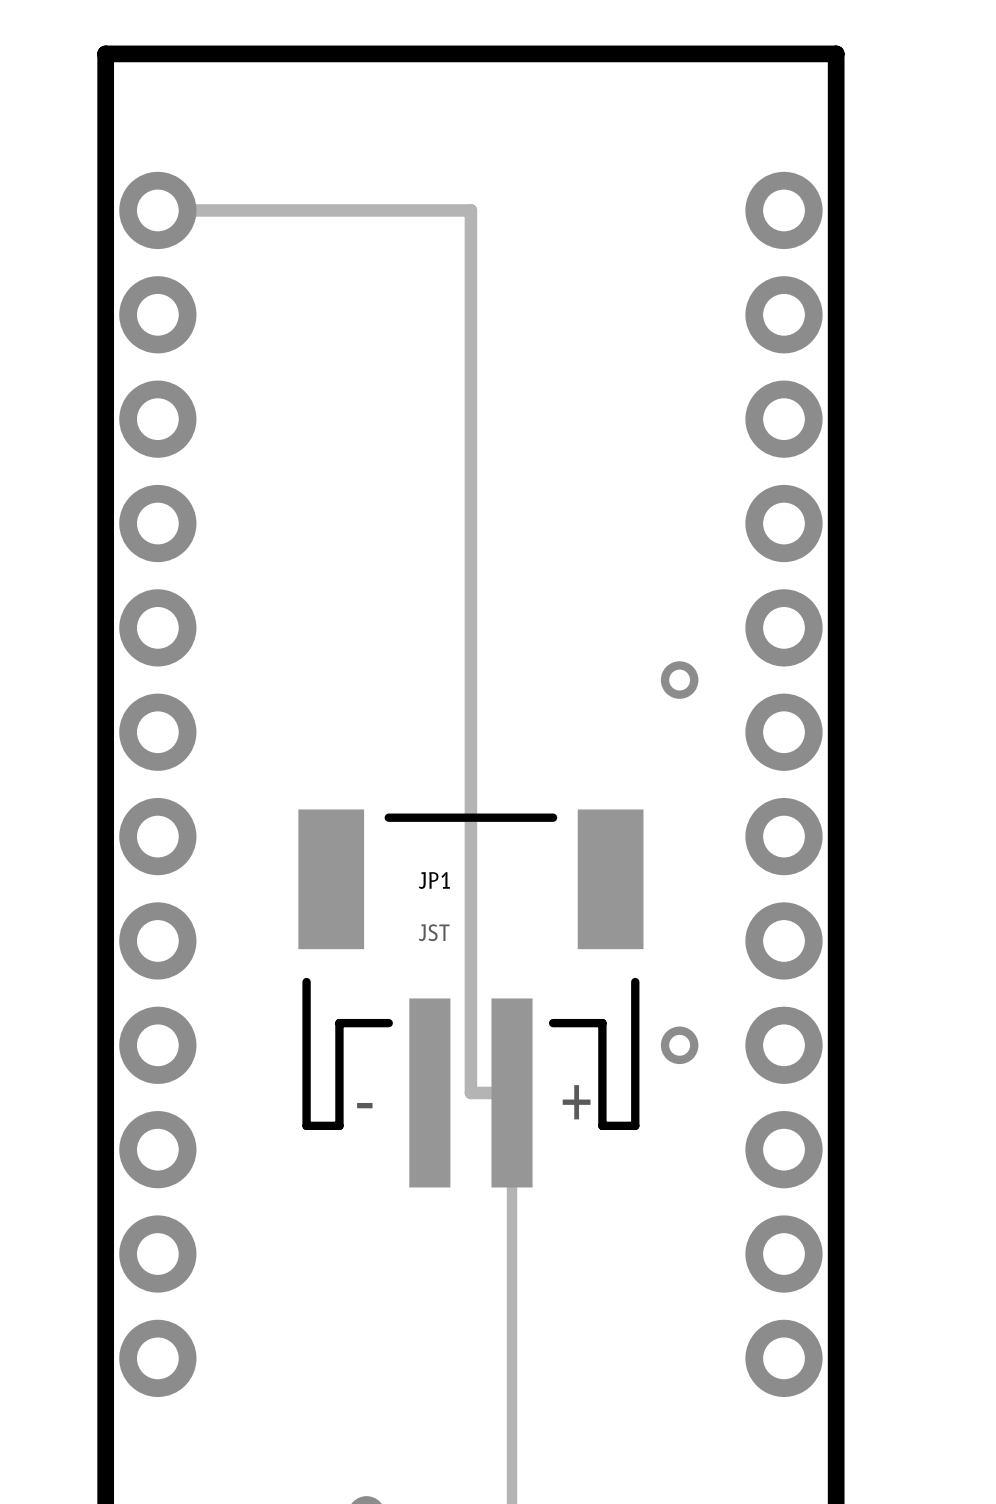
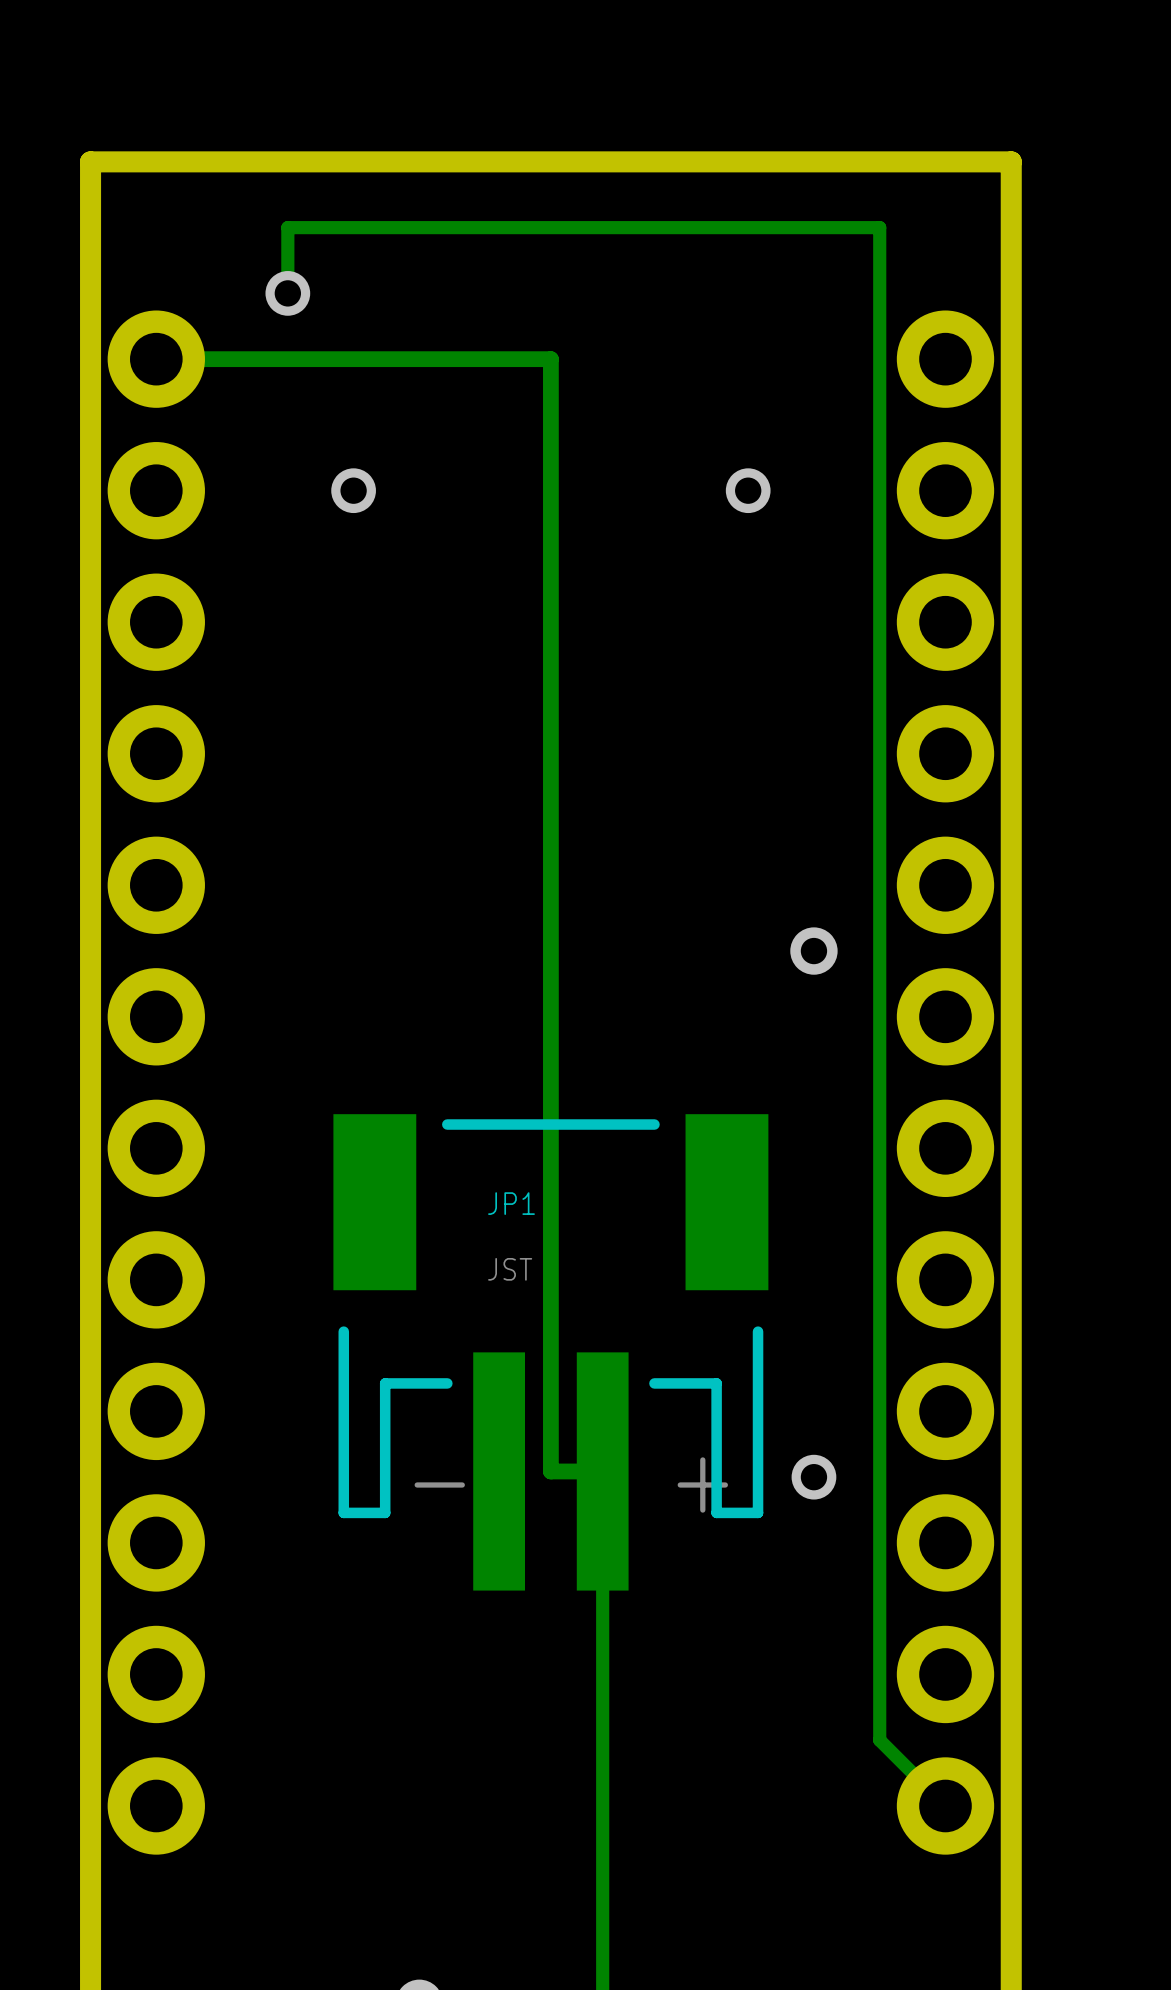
track: none -> (287, 293) (287, 227) (879, 227) (879, 1740) (945, 1805)
via: none -> (287, 293)
via: none -> (353, 490)
via: none -> (748, 490)
via: (679, 1045) -> none
via: none -> (813, 1477)

